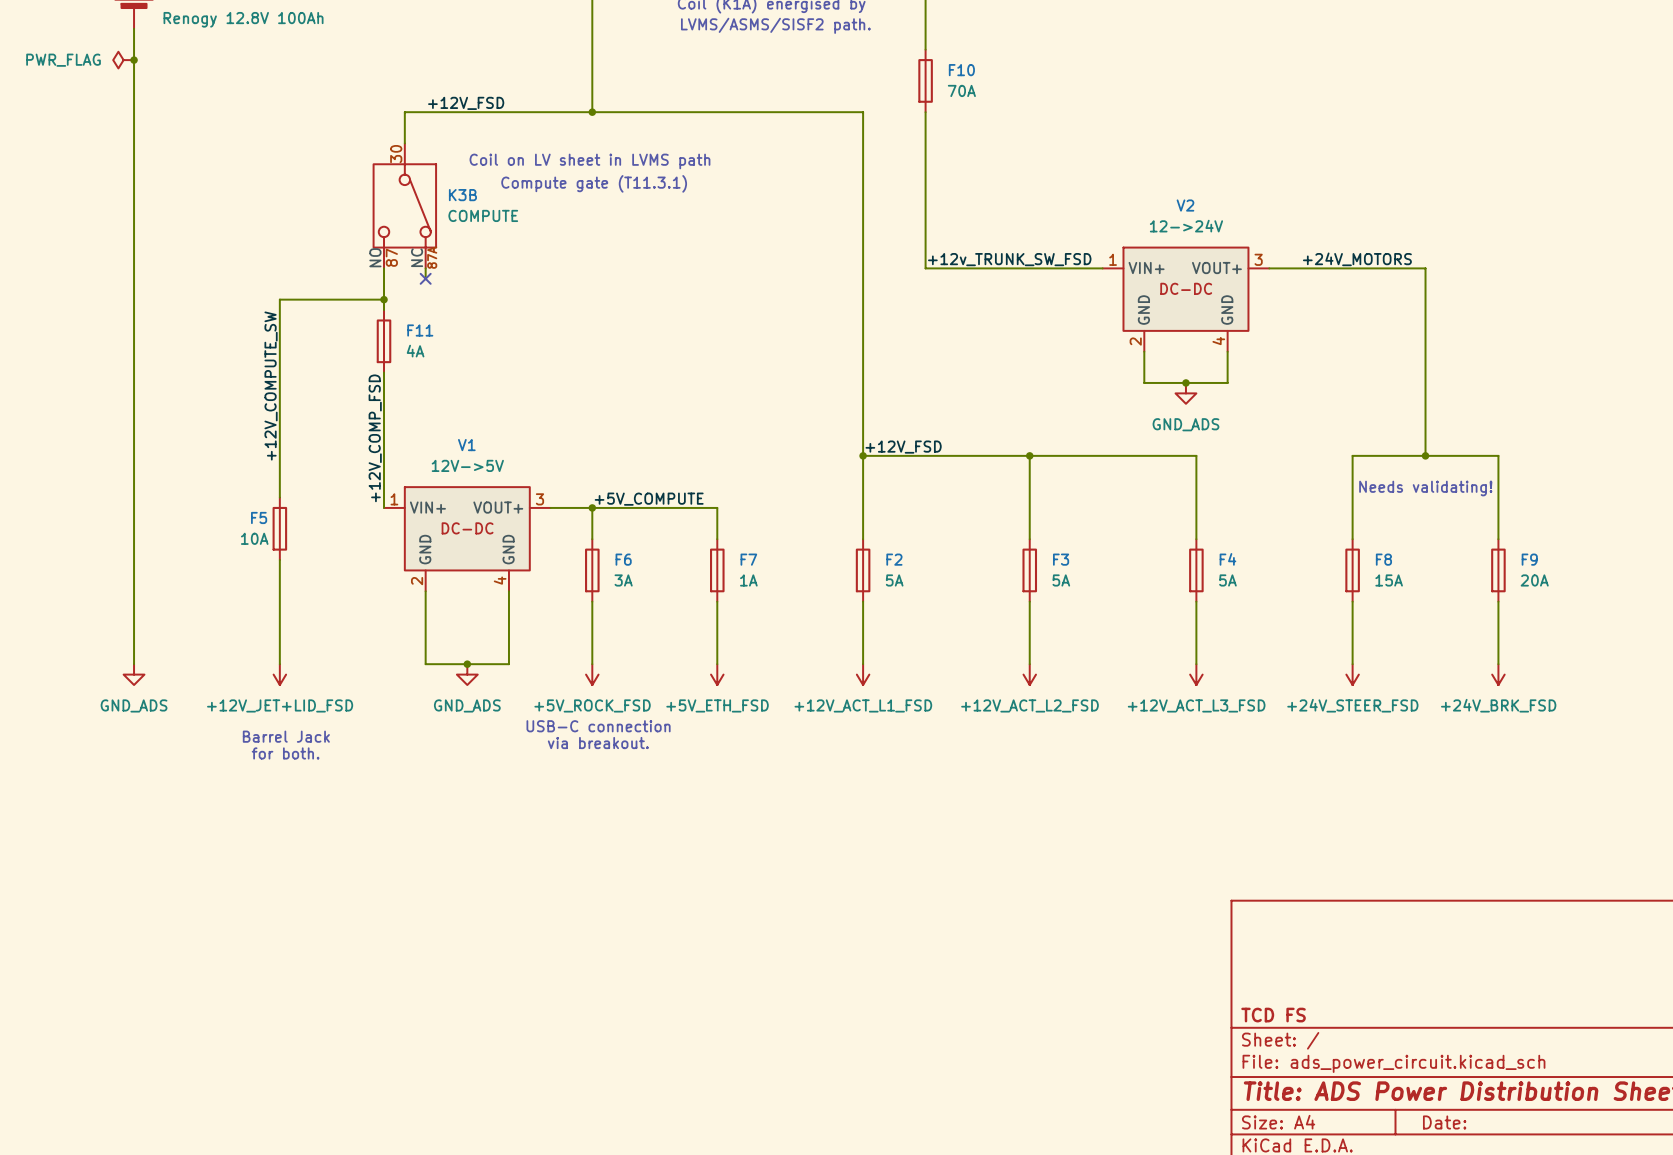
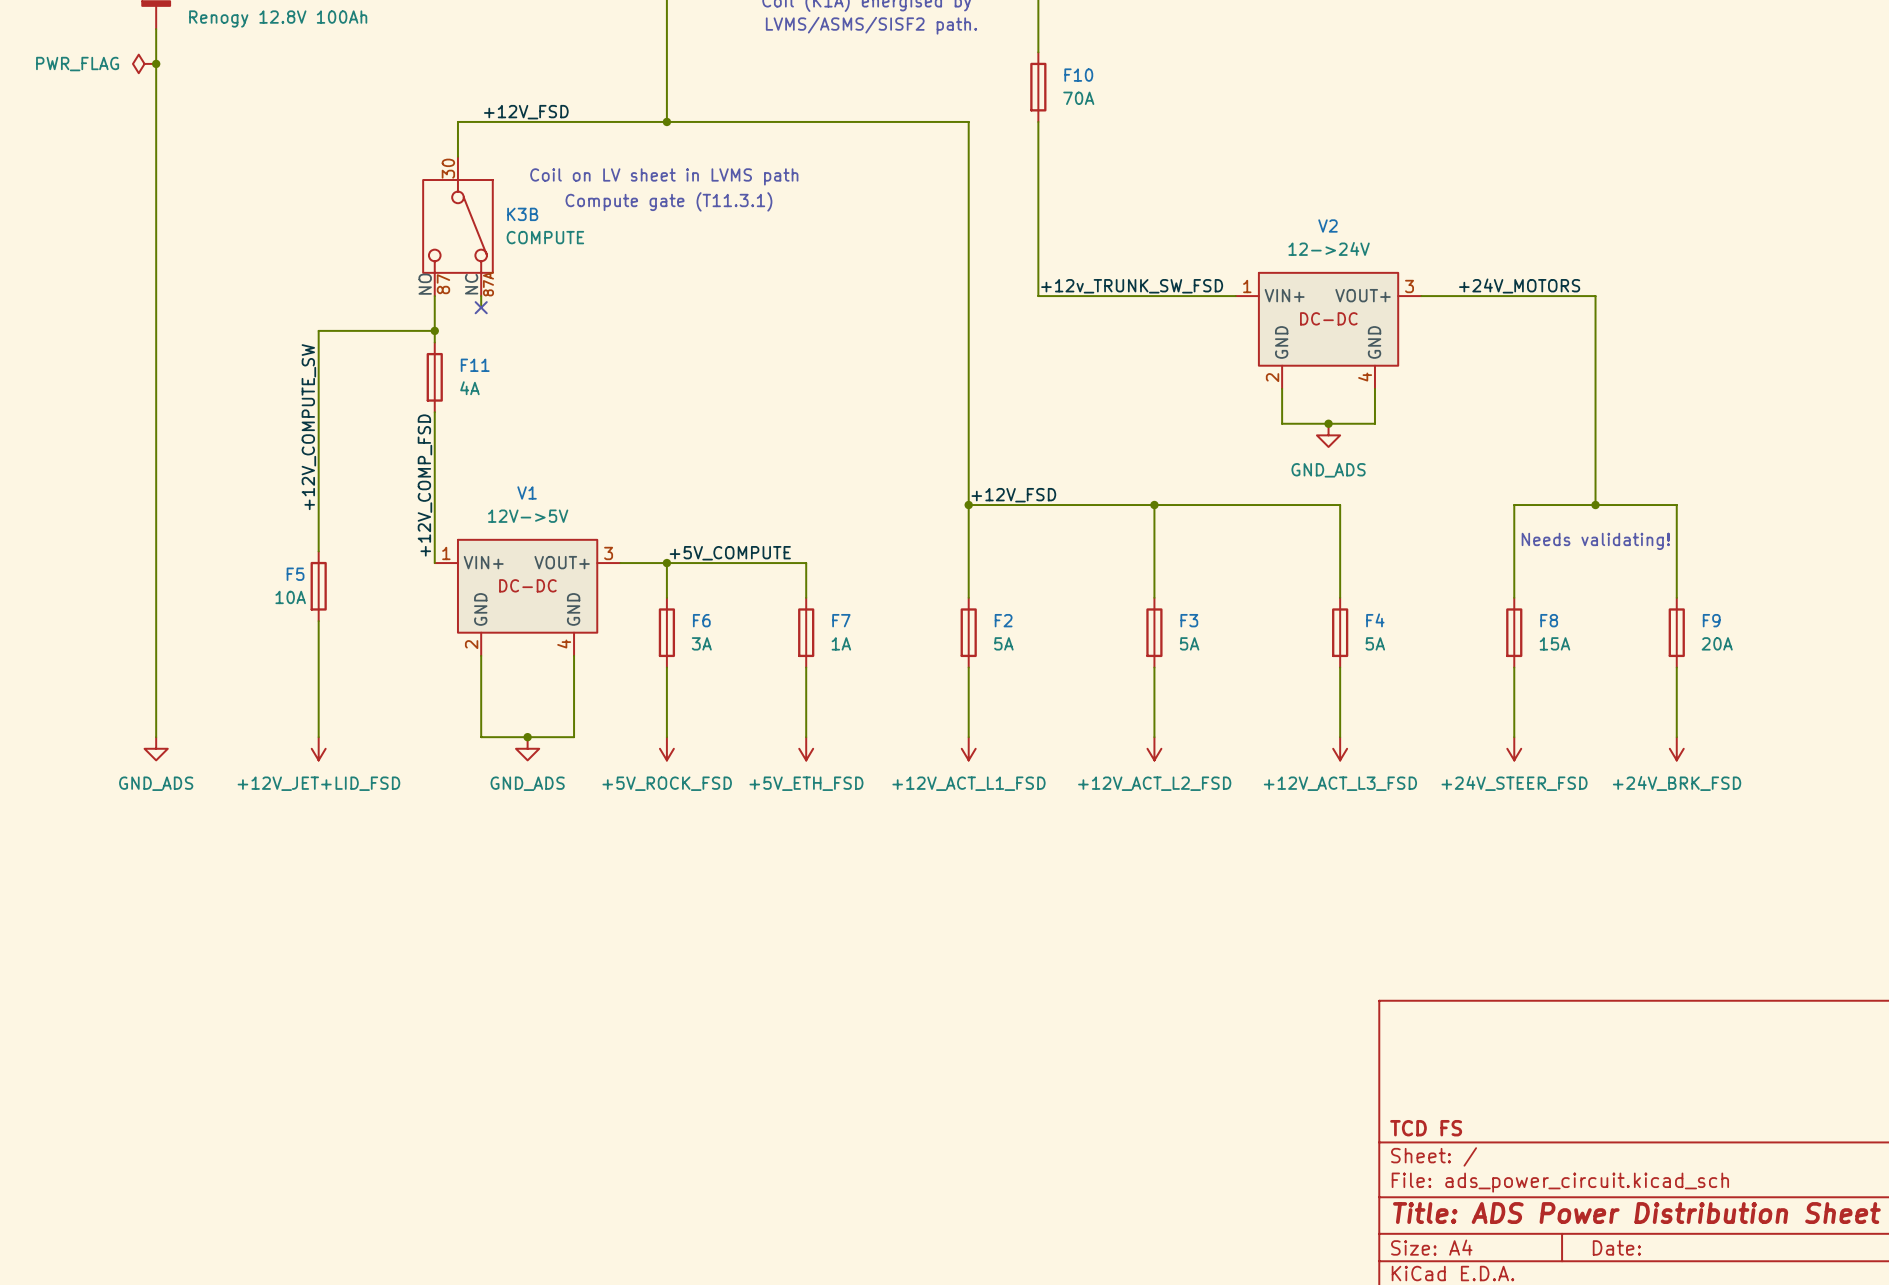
text: USB-C connection (598, 726) -> none
text: Barrel Jack (286, 736) -> none
text: via breakout. (598, 743) -> none
text: for both. (285, 753) -> none

